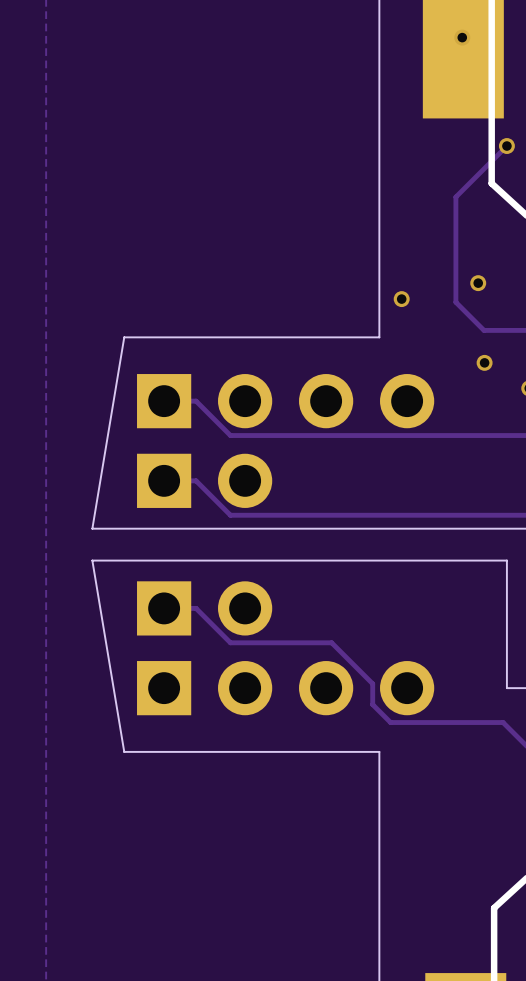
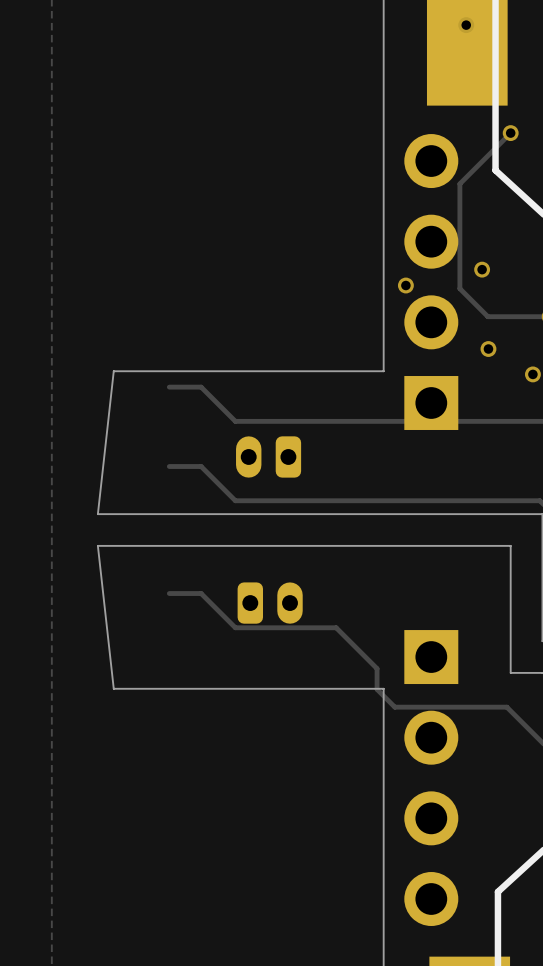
board edge: (379, 337) (124, 337) (92, 528) -> (383, 323) (383, 371) (113, 371) (97, 514)
part rotation: 0° (285, 401) -> 90° counterclockwise (431, 282)
part: none -> (268, 456)
part: (204, 480) -> none
board edge: (92, 560) (124, 751) (379, 751) -> (97, 545) (113, 688) (383, 688) (383, 736)
part: (204, 608) -> none
part: none -> (270, 603)
part rotation: 0° (285, 688) -> 90° clockwise (431, 778)

